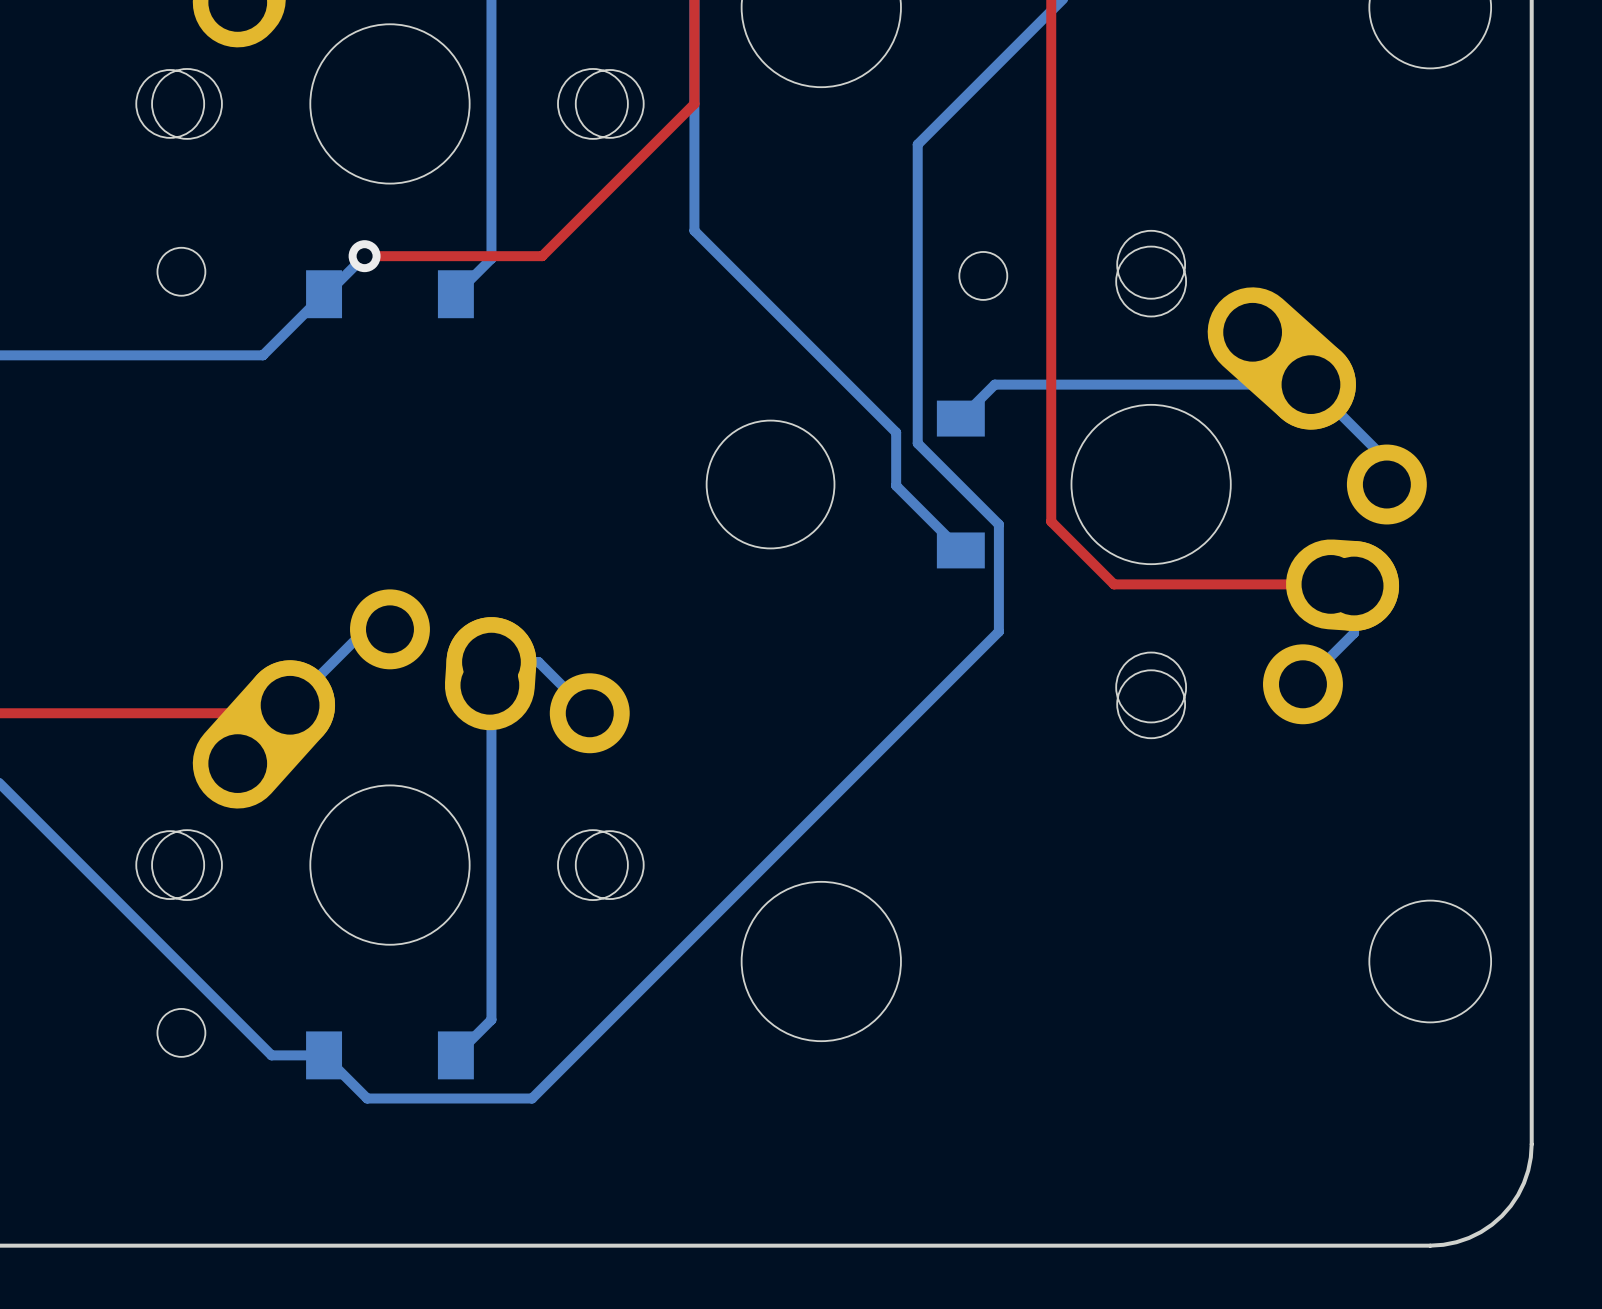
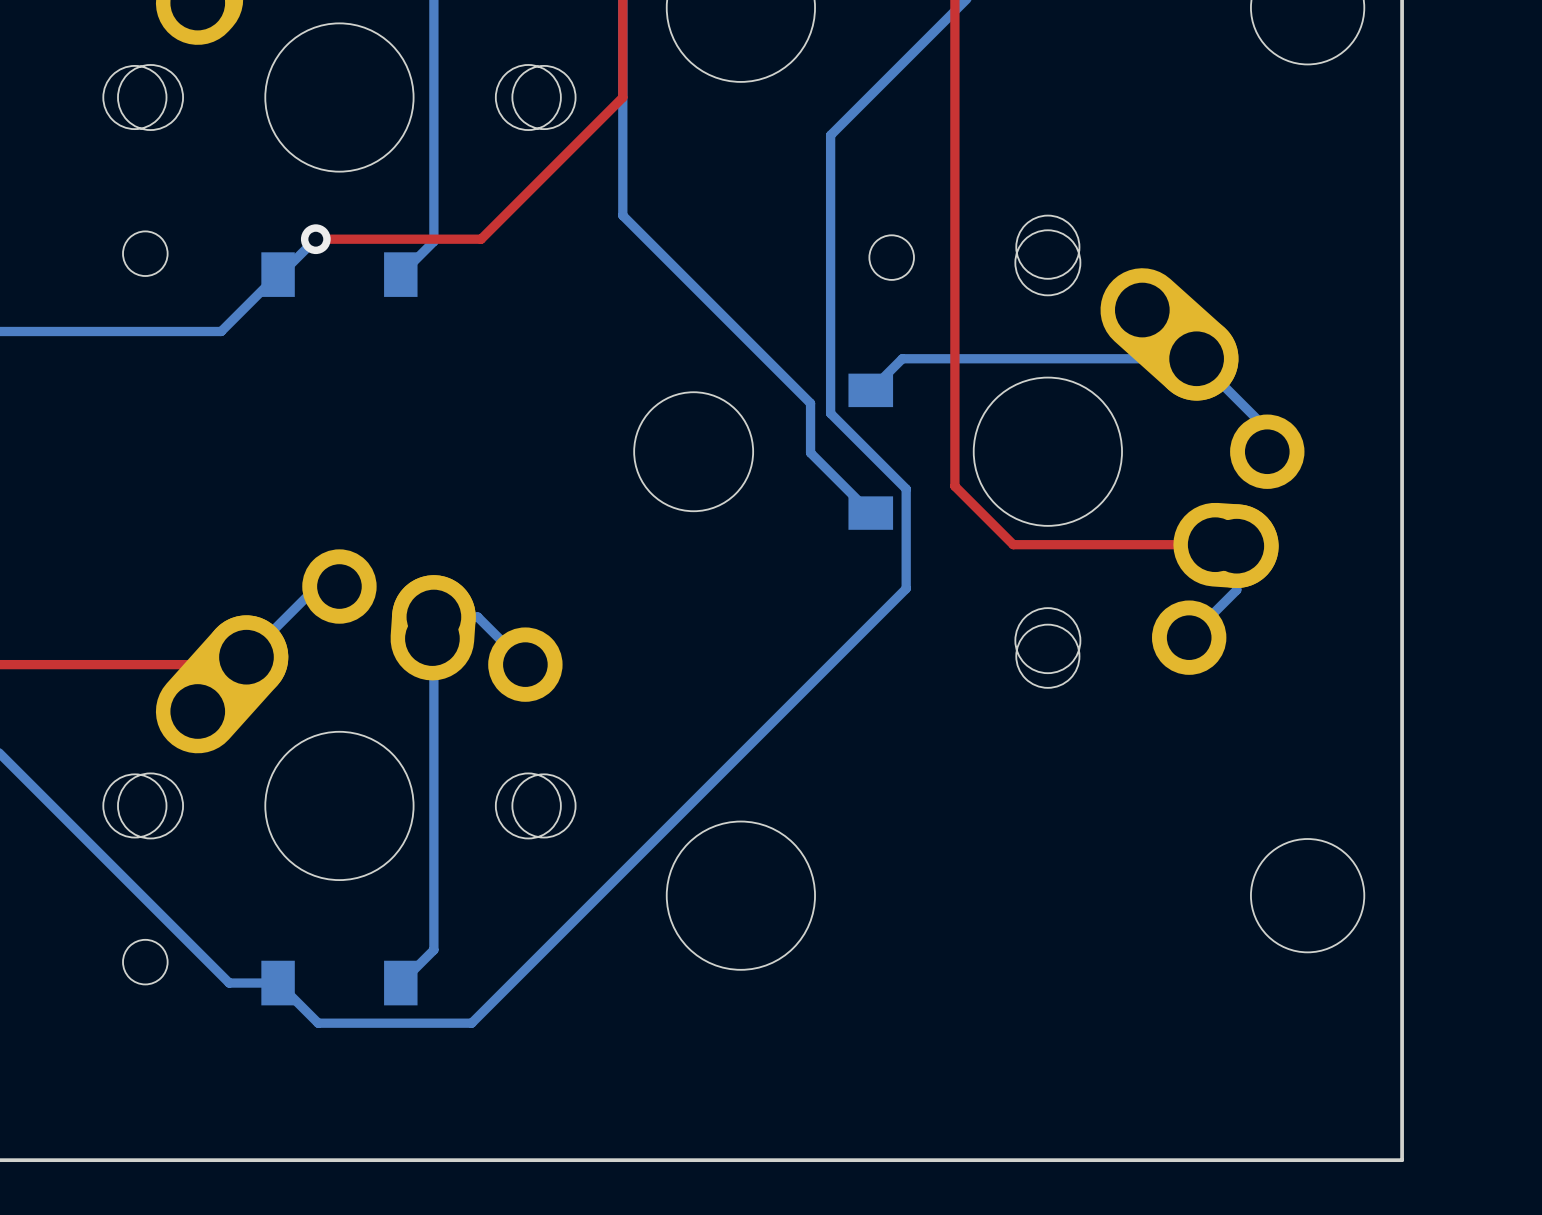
board edge: (1531, 1144) (1528, 1170) (1523, 1183) (1518, 1194) (1501, 1215) (1480, 1232) (1469, 1237) (1456, 1242) (1430, 1245) -> (1402, 1065) (1402, 1160) (1307, 1160)

